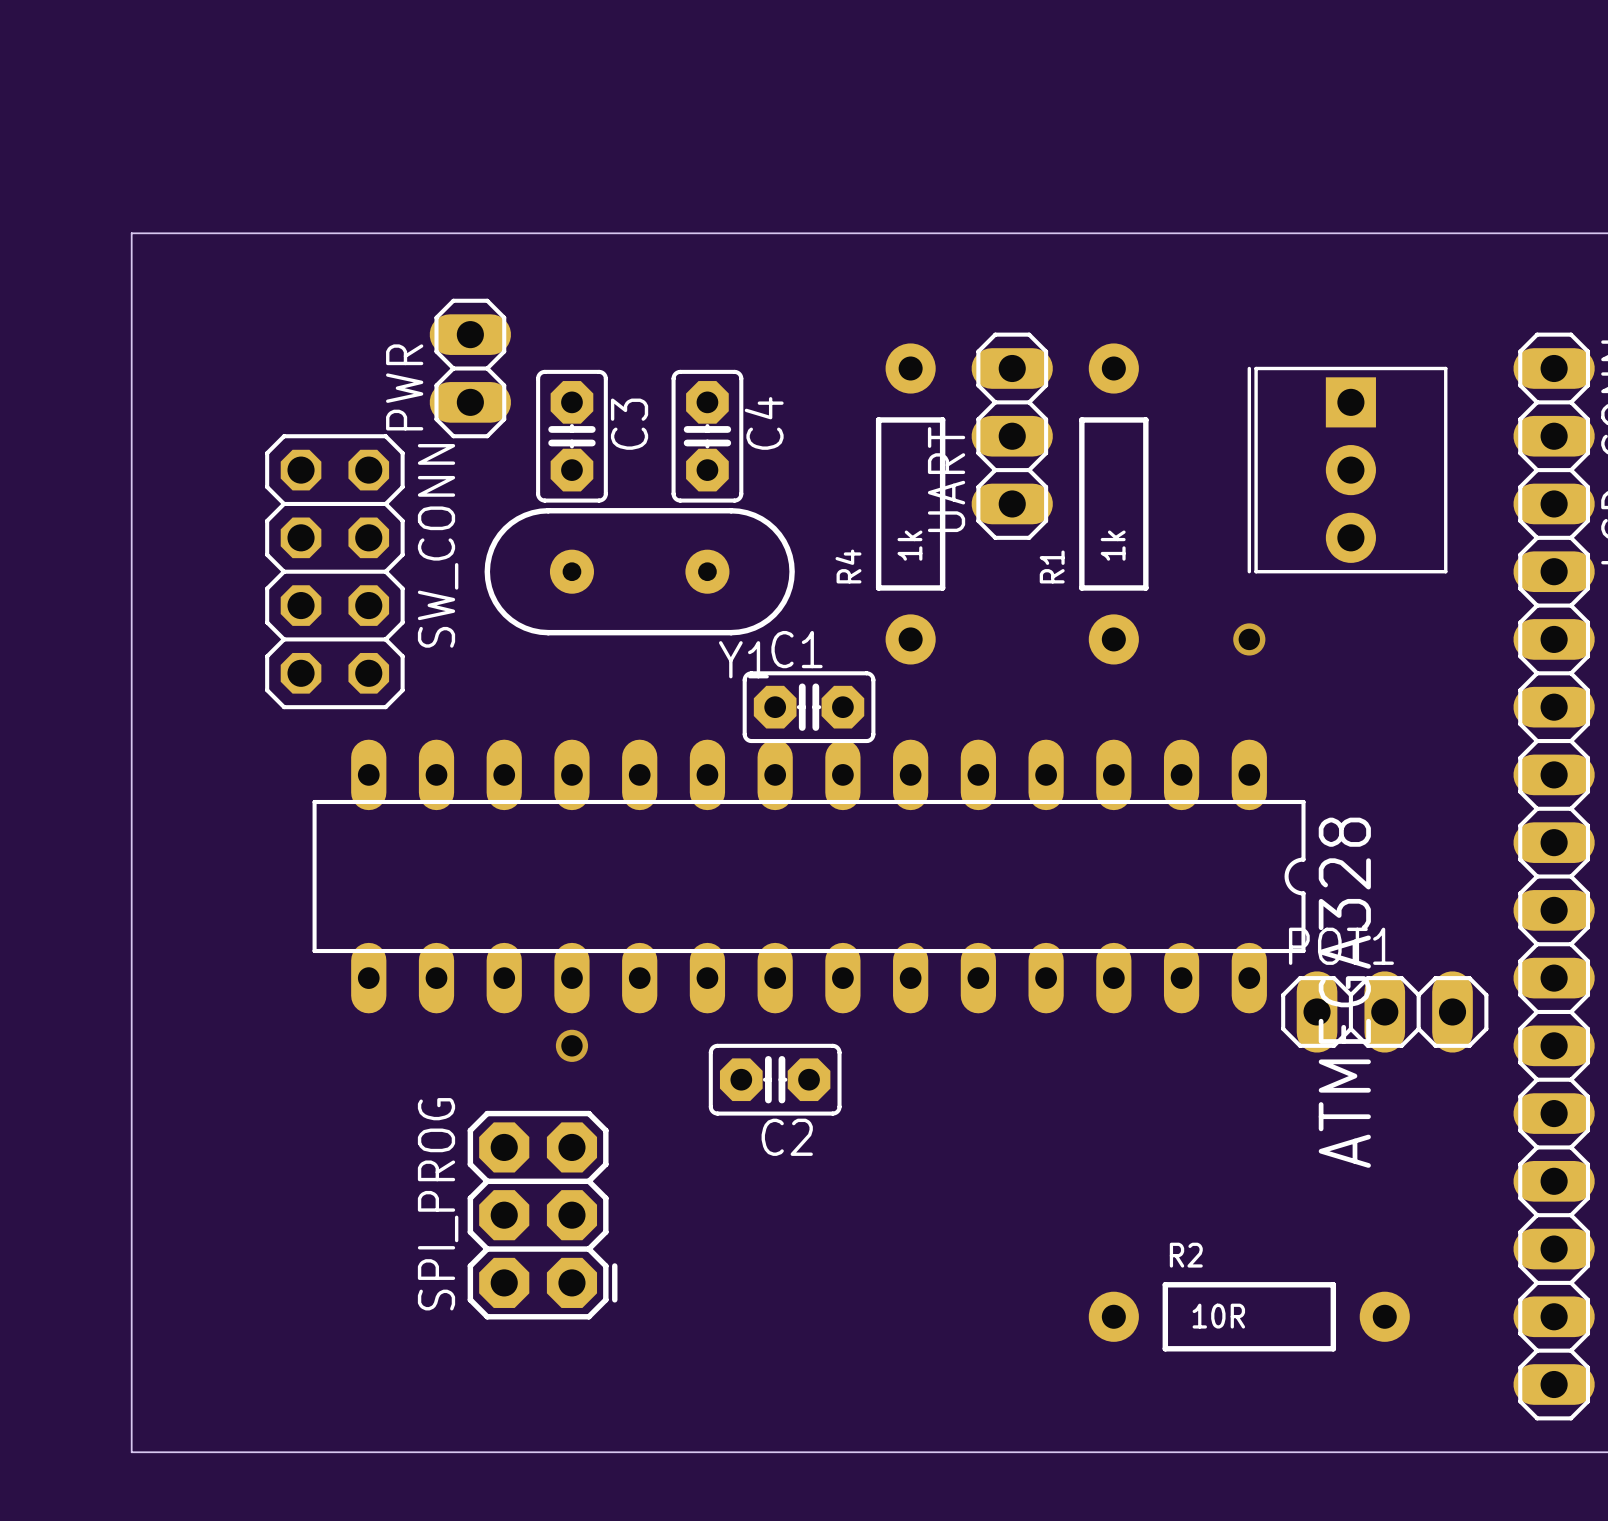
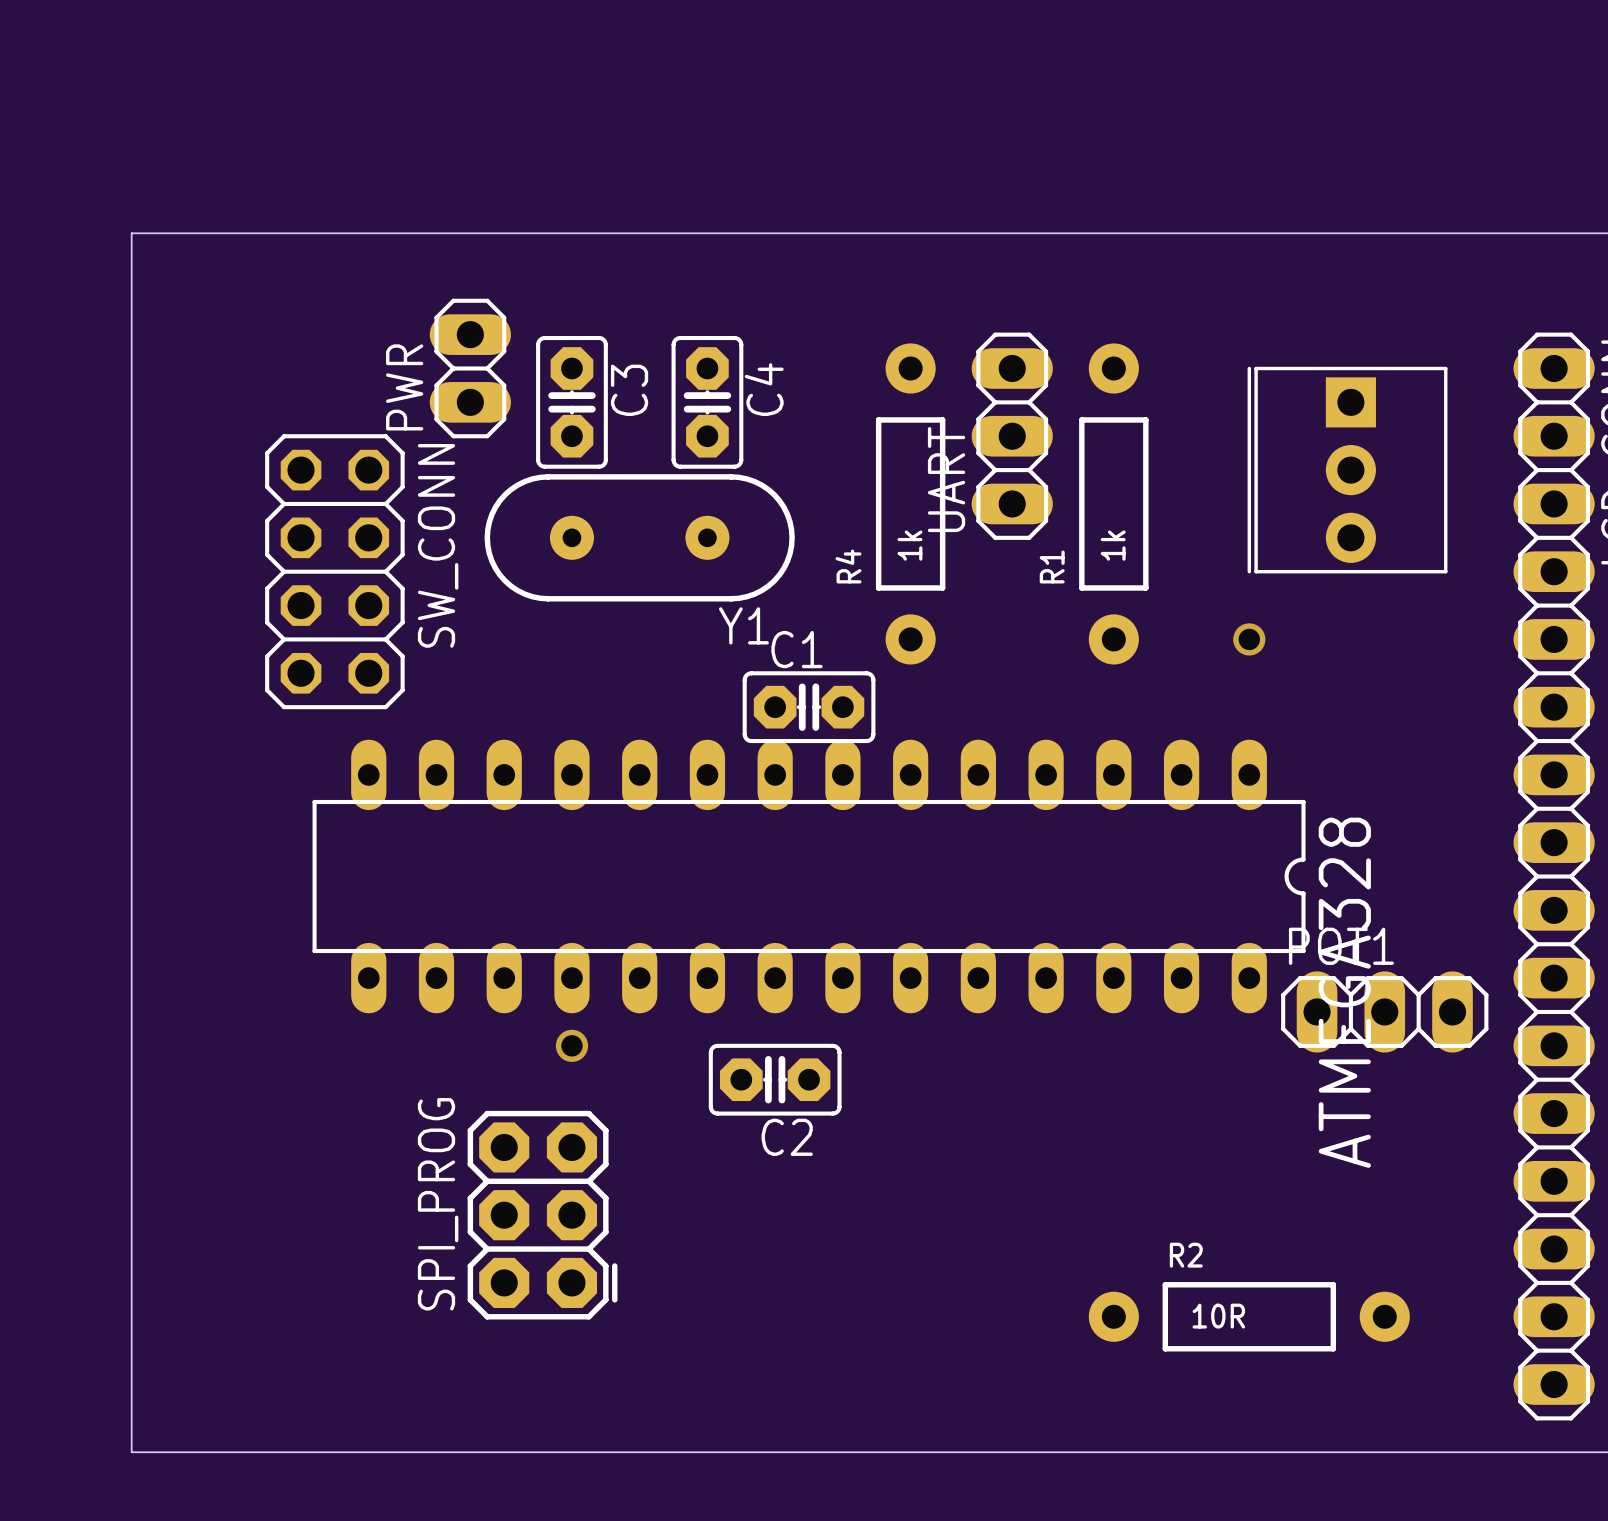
C3 position: (571, 436) -> (571, 402)
C4 position: (707, 436) -> (707, 402)
Y1 position: (639, 571) -> (639, 537)

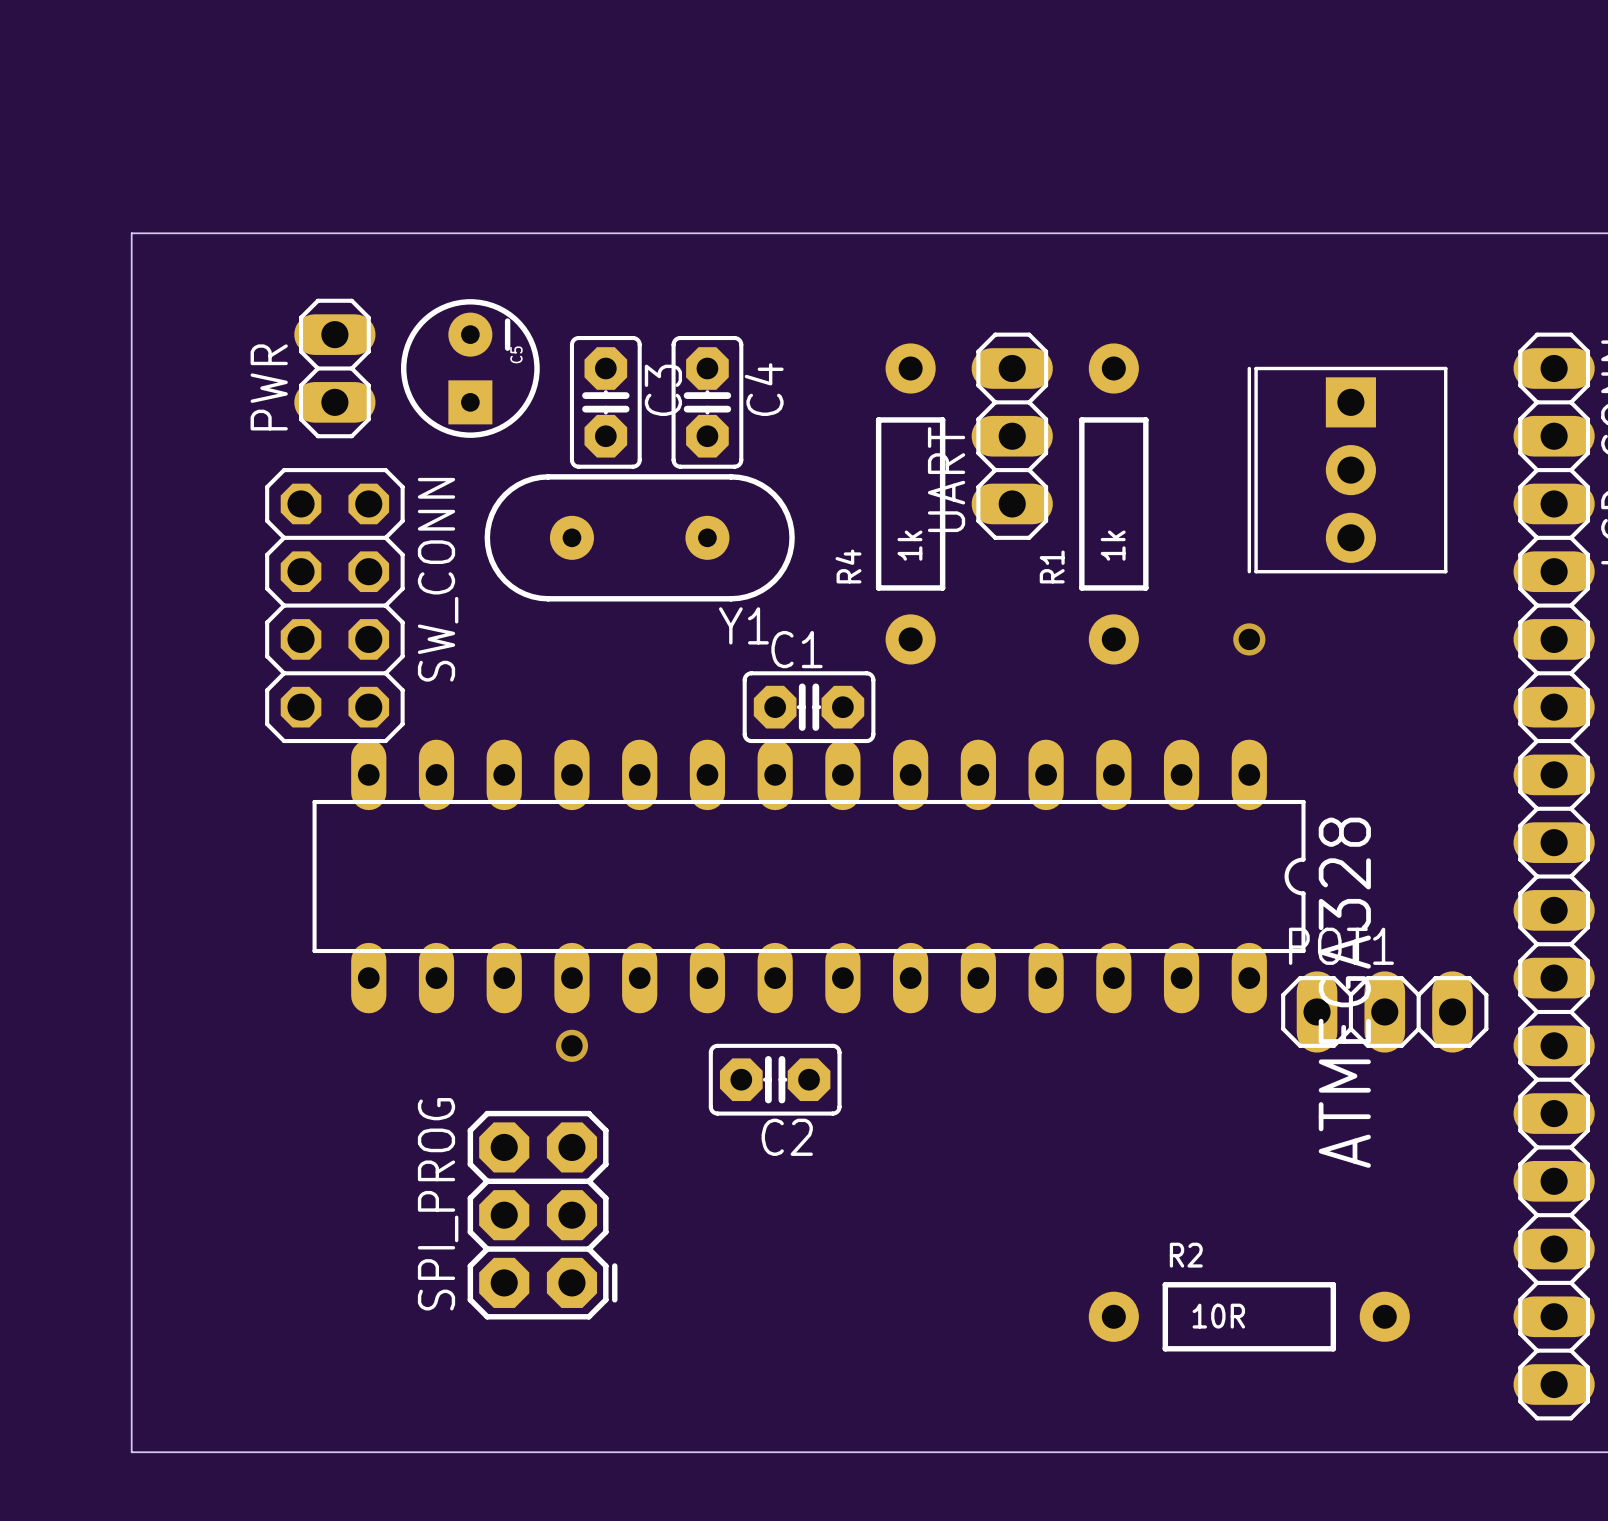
PWR position: (470, 368) -> (334, 368)
C5: none -> (470, 368)
C3 position: (571, 402) -> (605, 402)
SW_CONN position: (334, 571) -> (334, 605)

